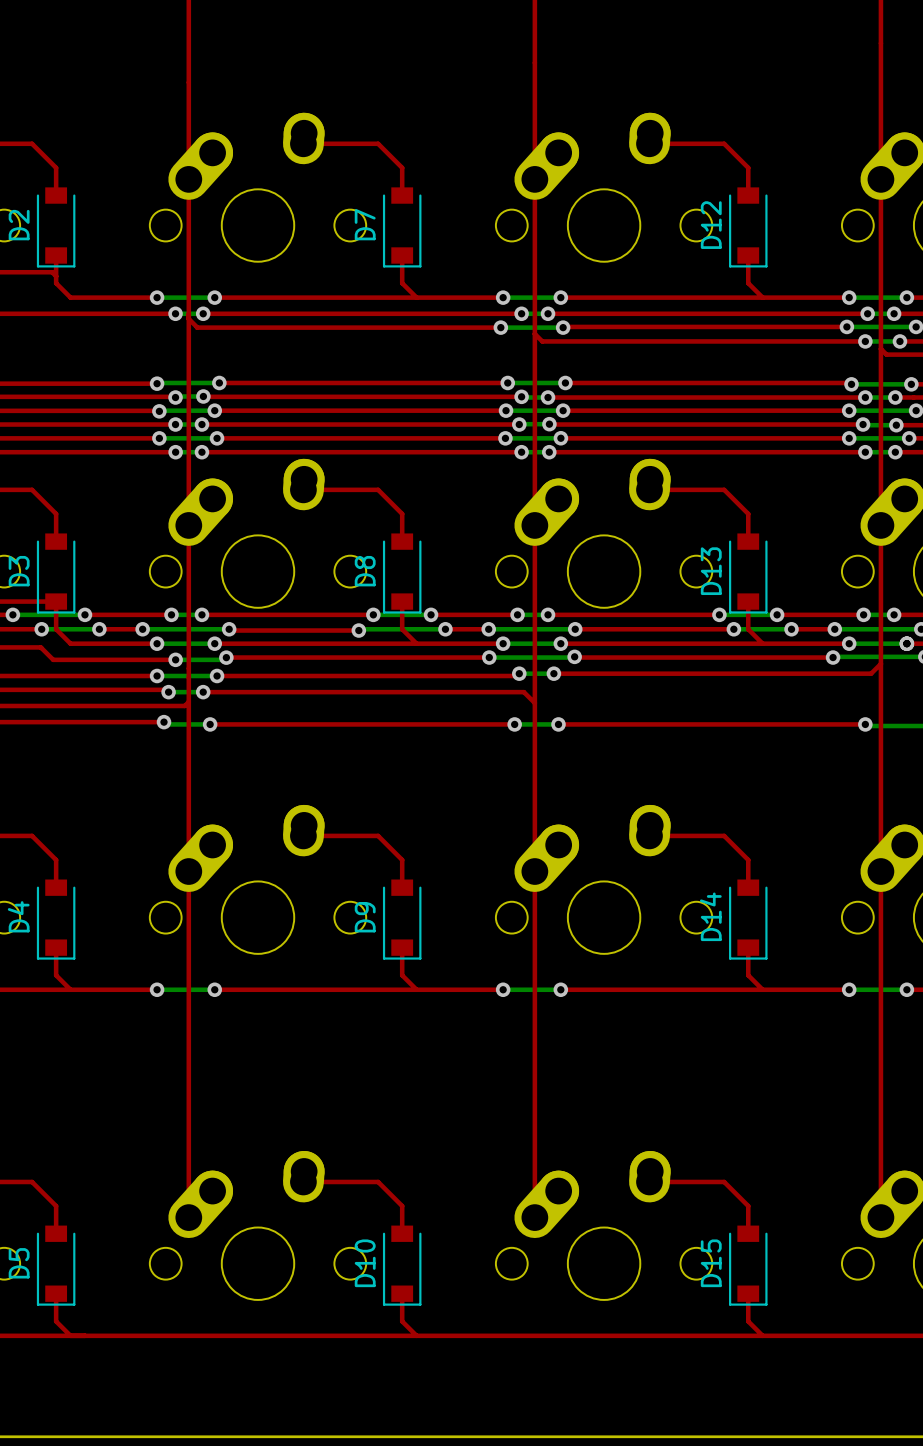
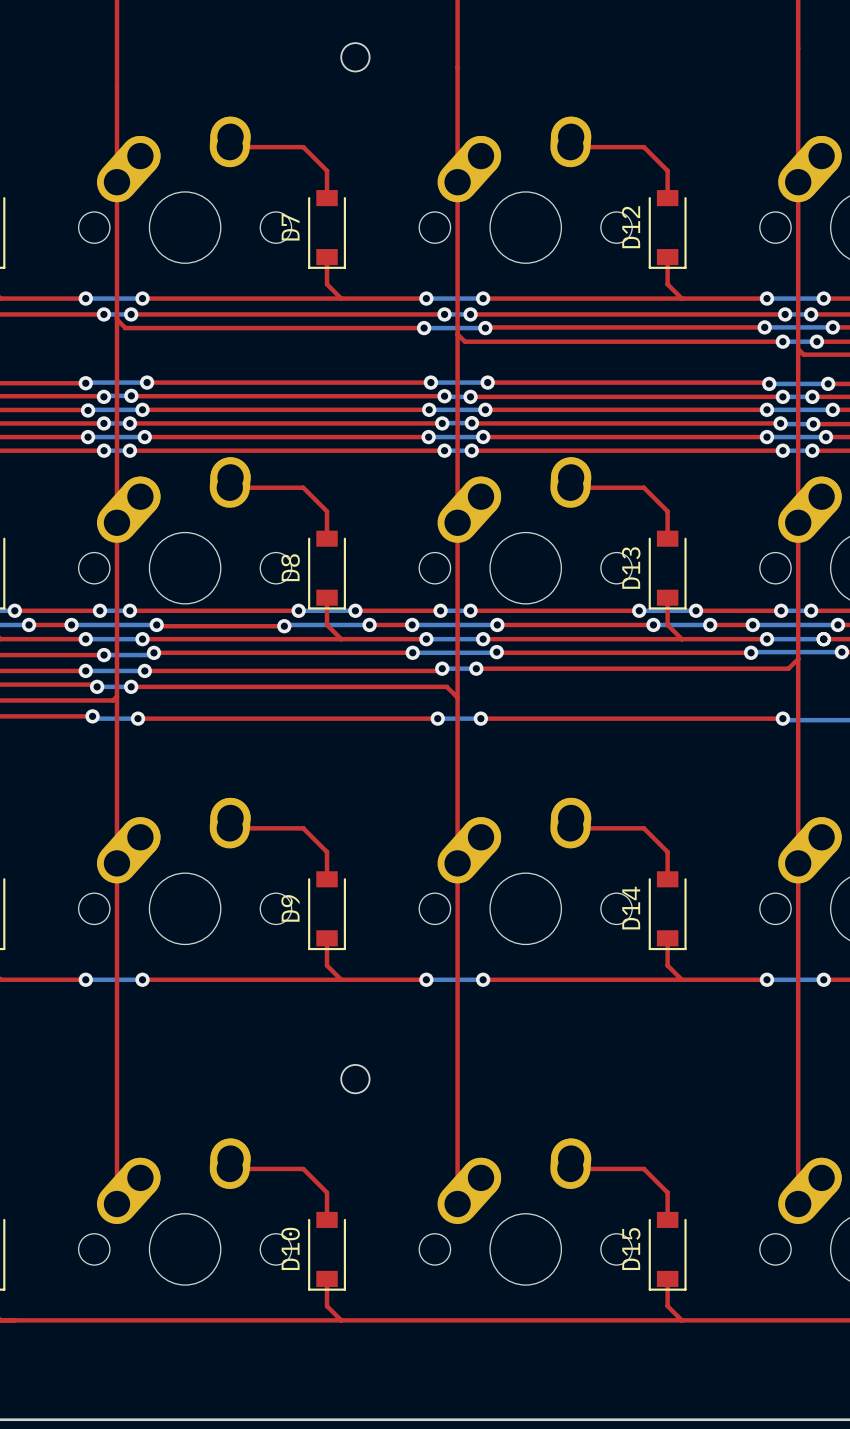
round board edge: none -> [340, 42, 371, 73]
round board edge: none -> [340, 1064, 371, 1095]

